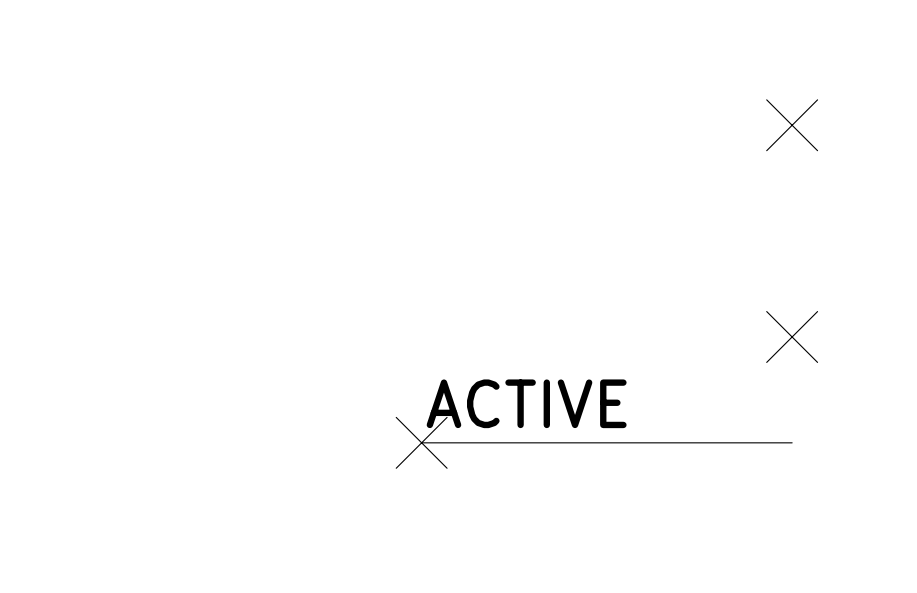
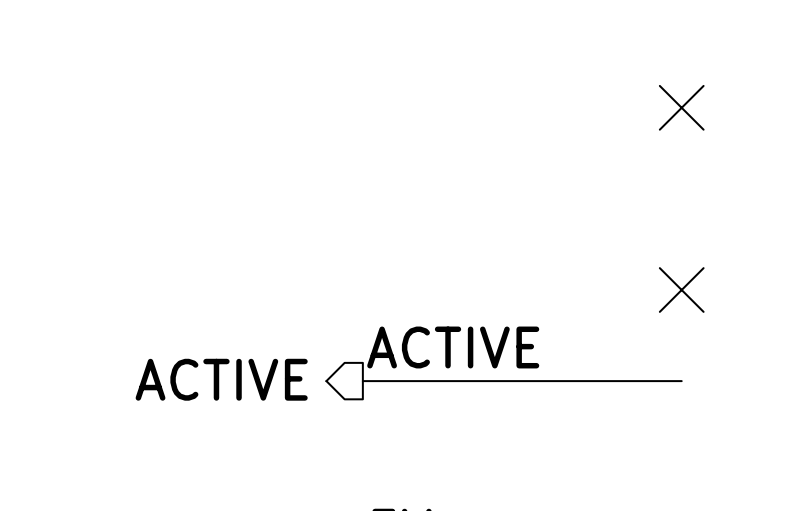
hierarchical label: none -> ACTIVE (221, 379)
no-connect mark: (421, 442) -> none

